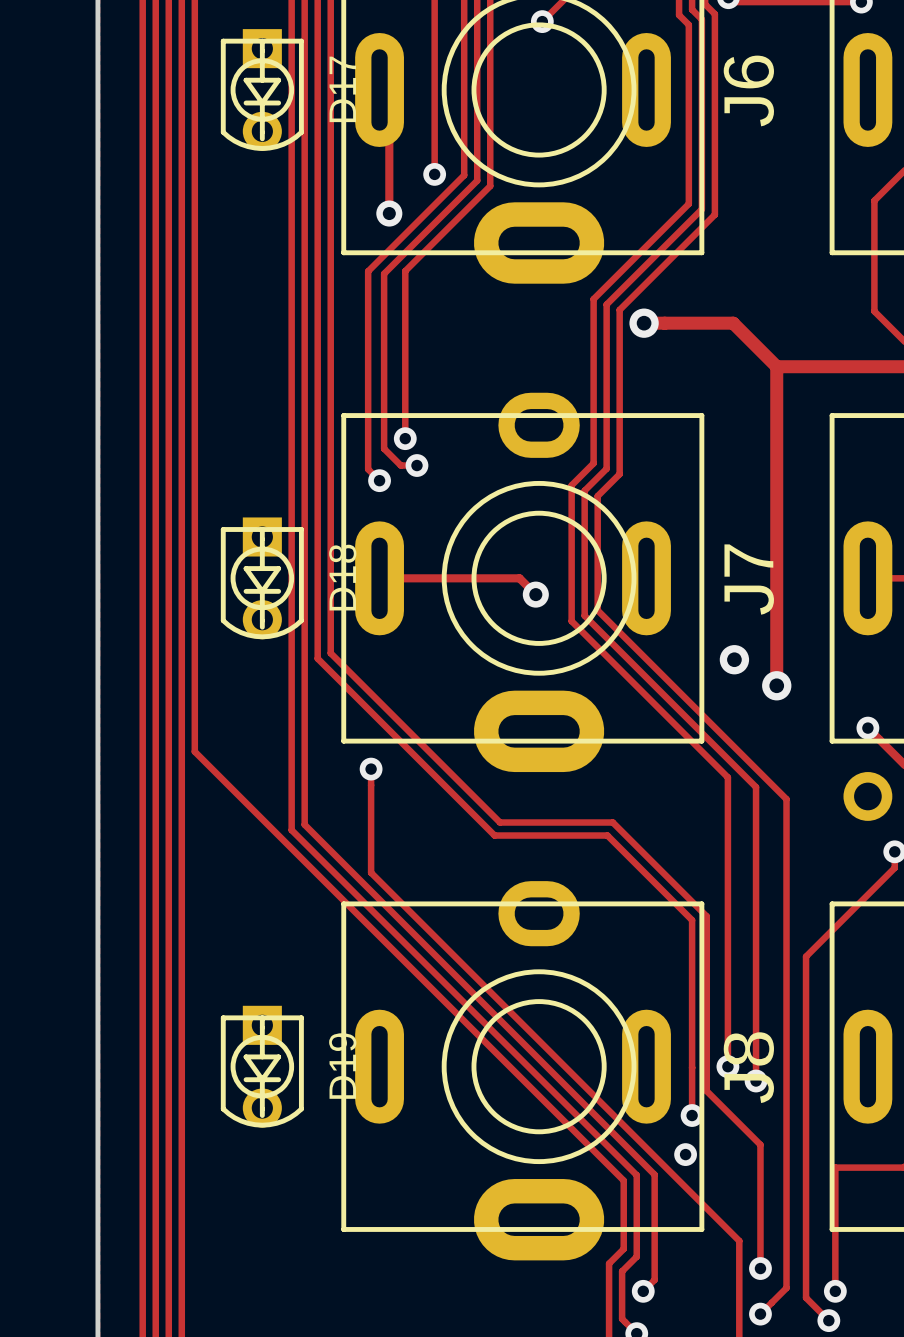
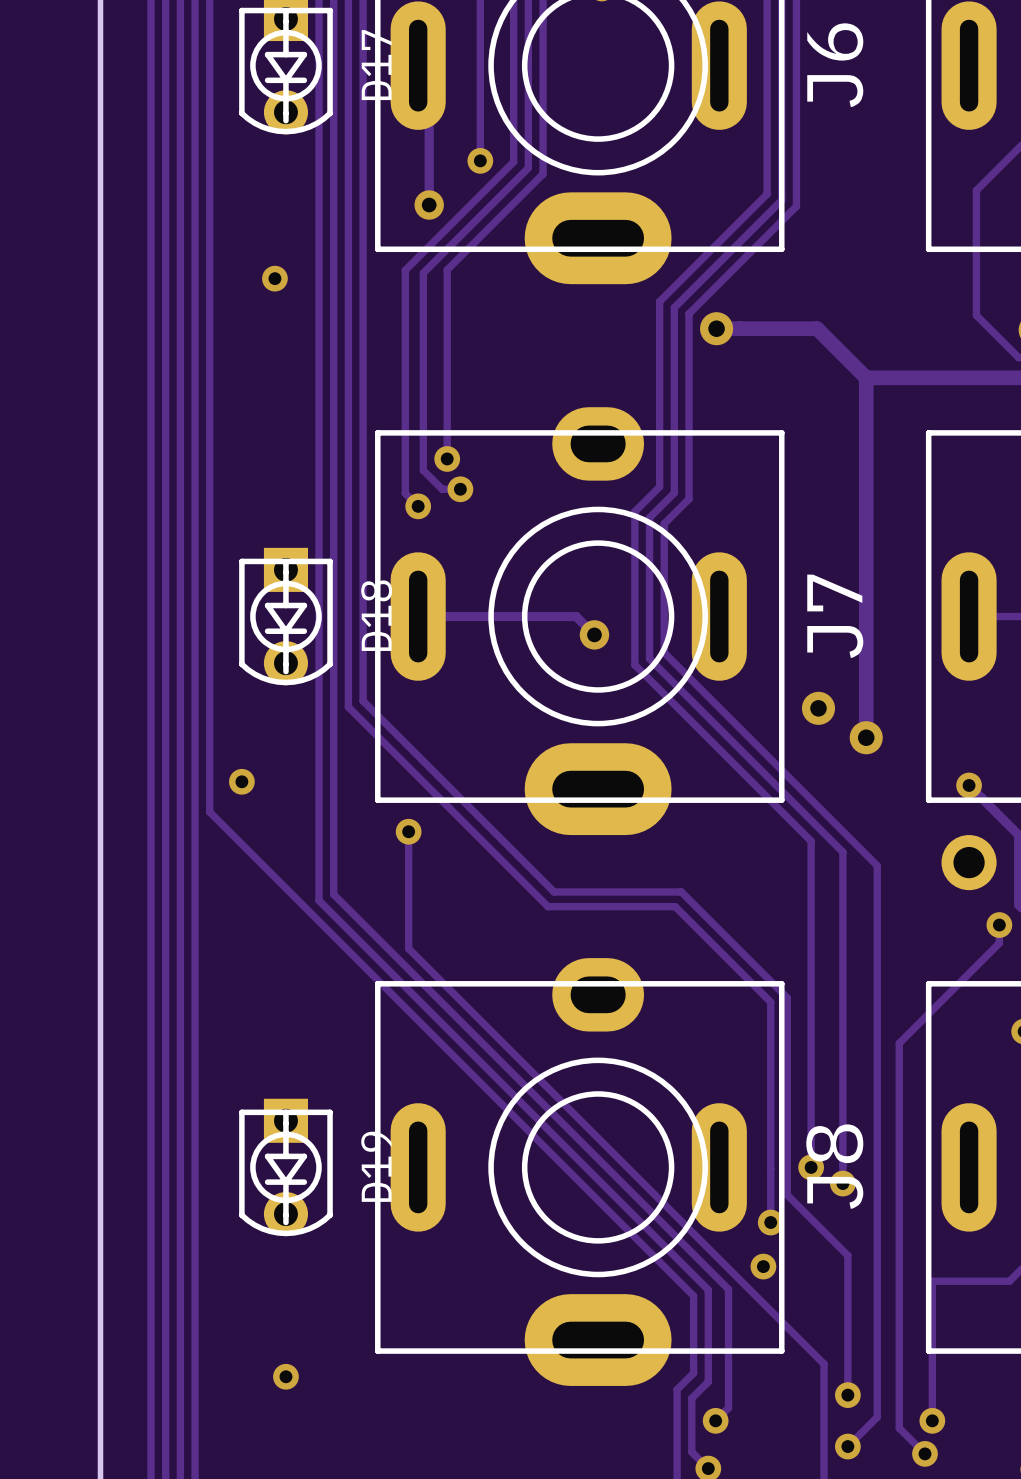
via: none -> (274, 278)
via: none -> (241, 781)
via: none -> (285, 1376)

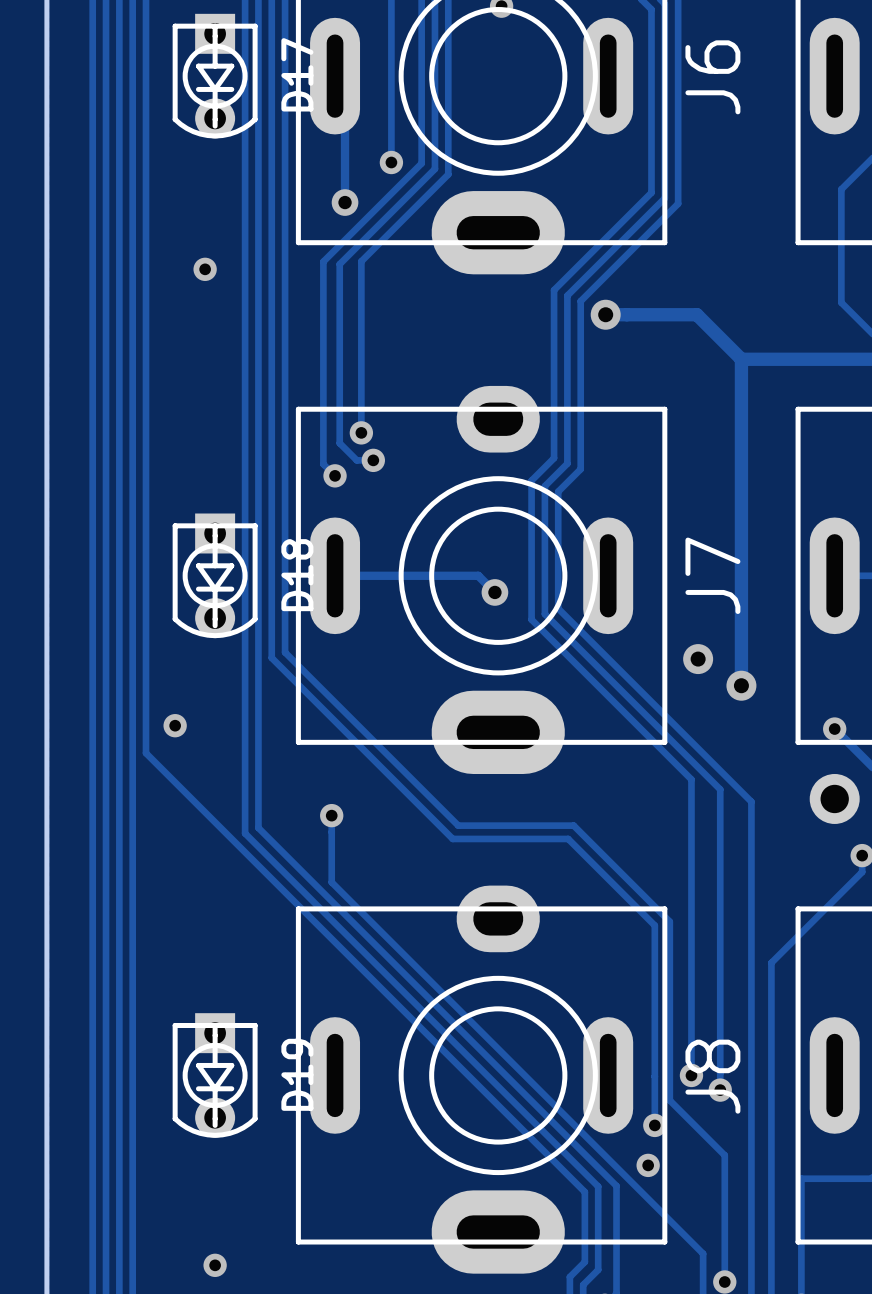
track: (408, 831) (408, 948) (414, 954) -> (331, 815) (331, 882)
via position: (408, 831) -> (331, 815)

